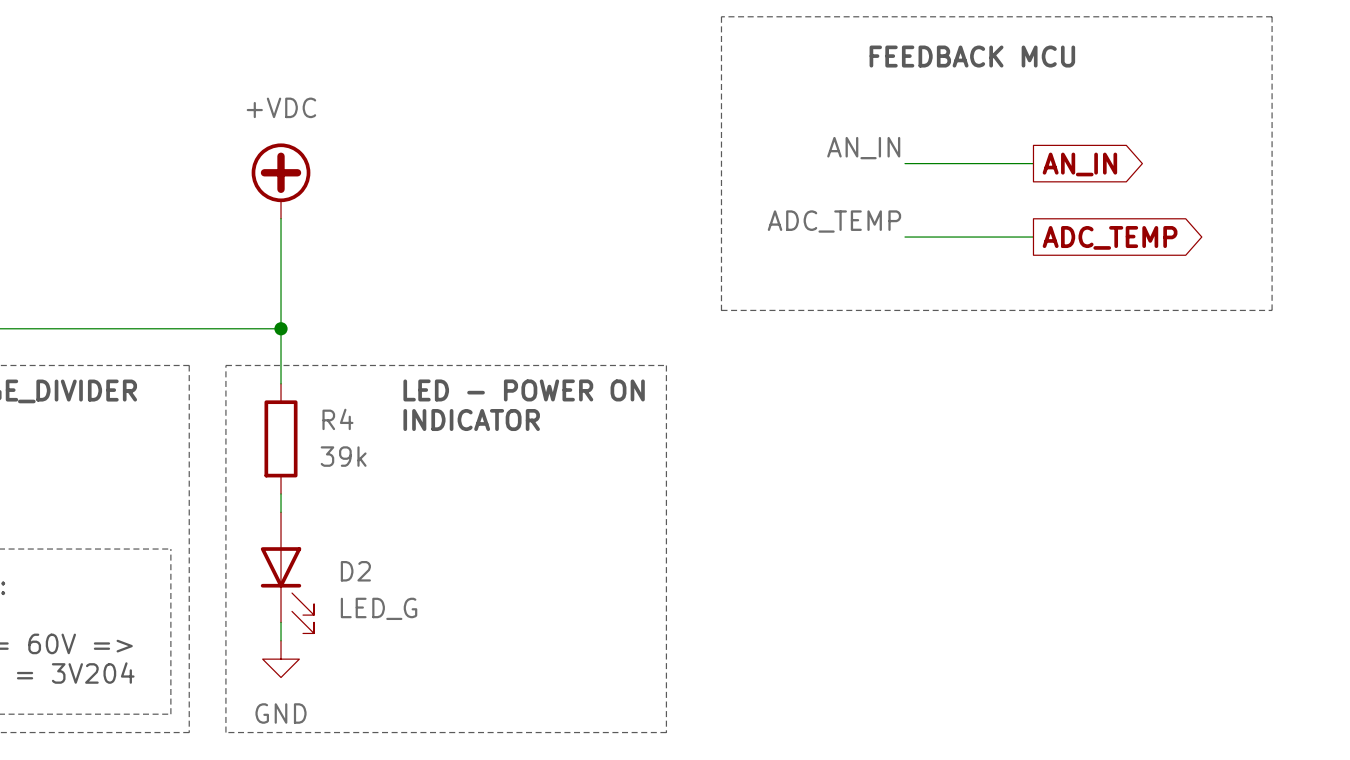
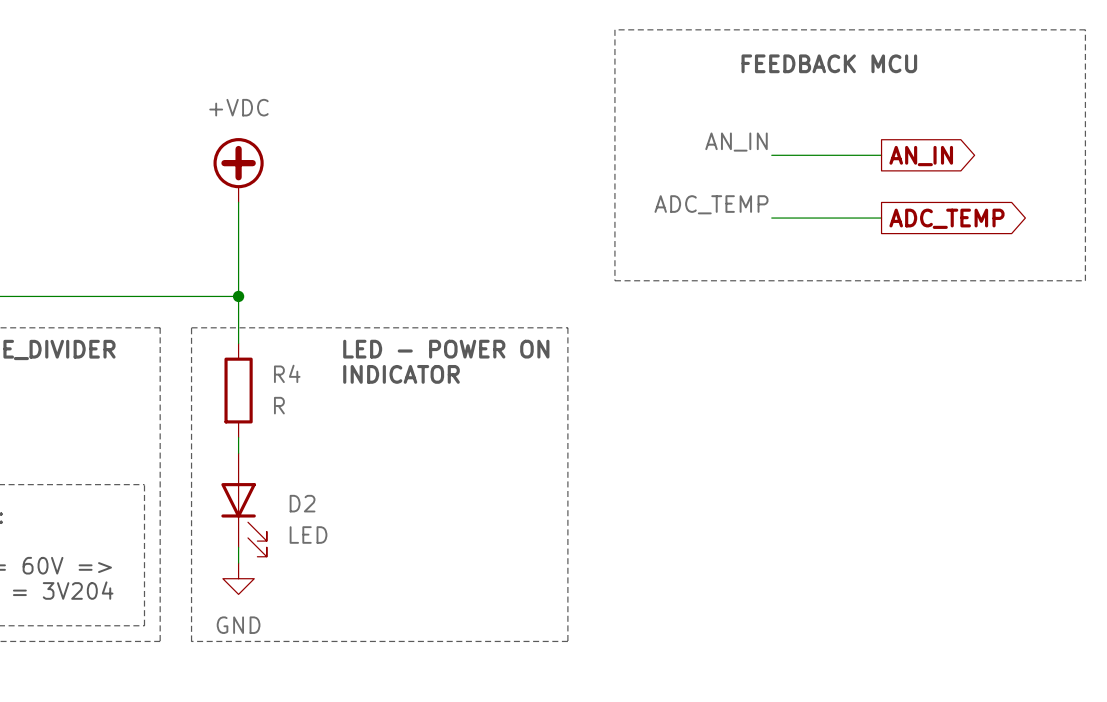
R4 value: 39k (343, 456) -> R (279, 405)
D2 value: LED_G (379, 608) -> LED (308, 535)

